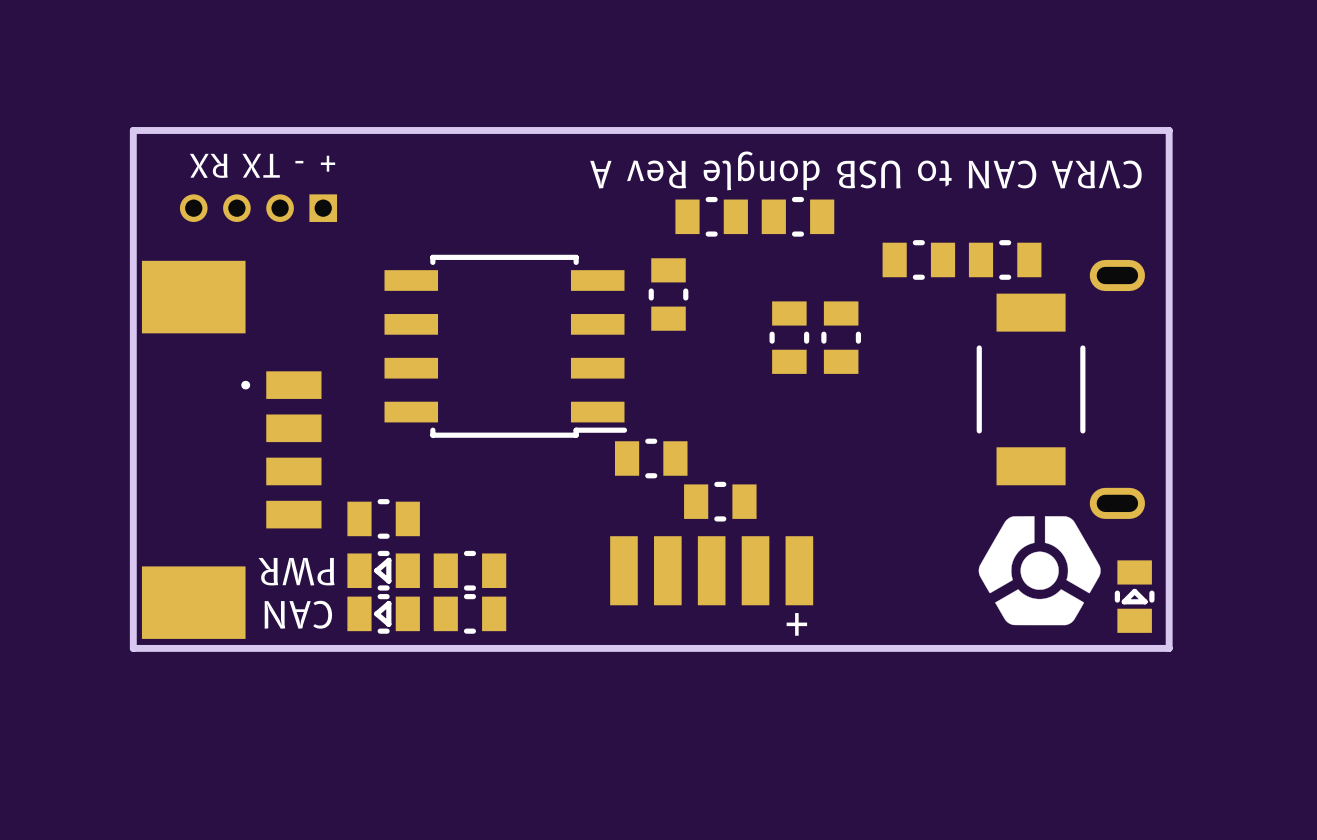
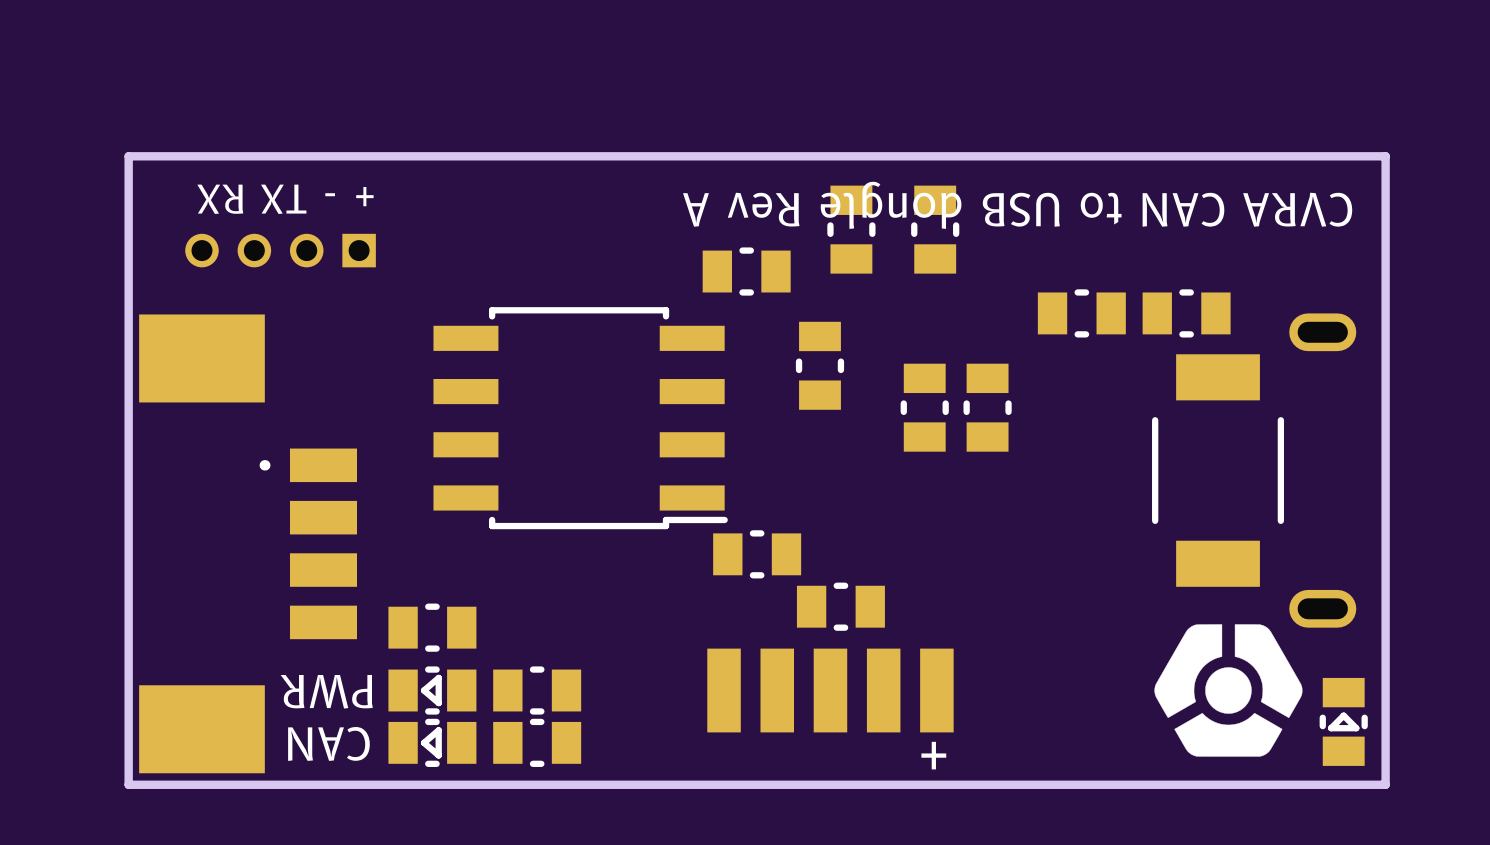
part rotation: 0° (711, 216) -> 90° clockwise (851, 229)
part rotation: 0° (797, 216) -> 90° clockwise (935, 229)
part: none -> (746, 271)
part position: (668, 294) -> (819, 365)

